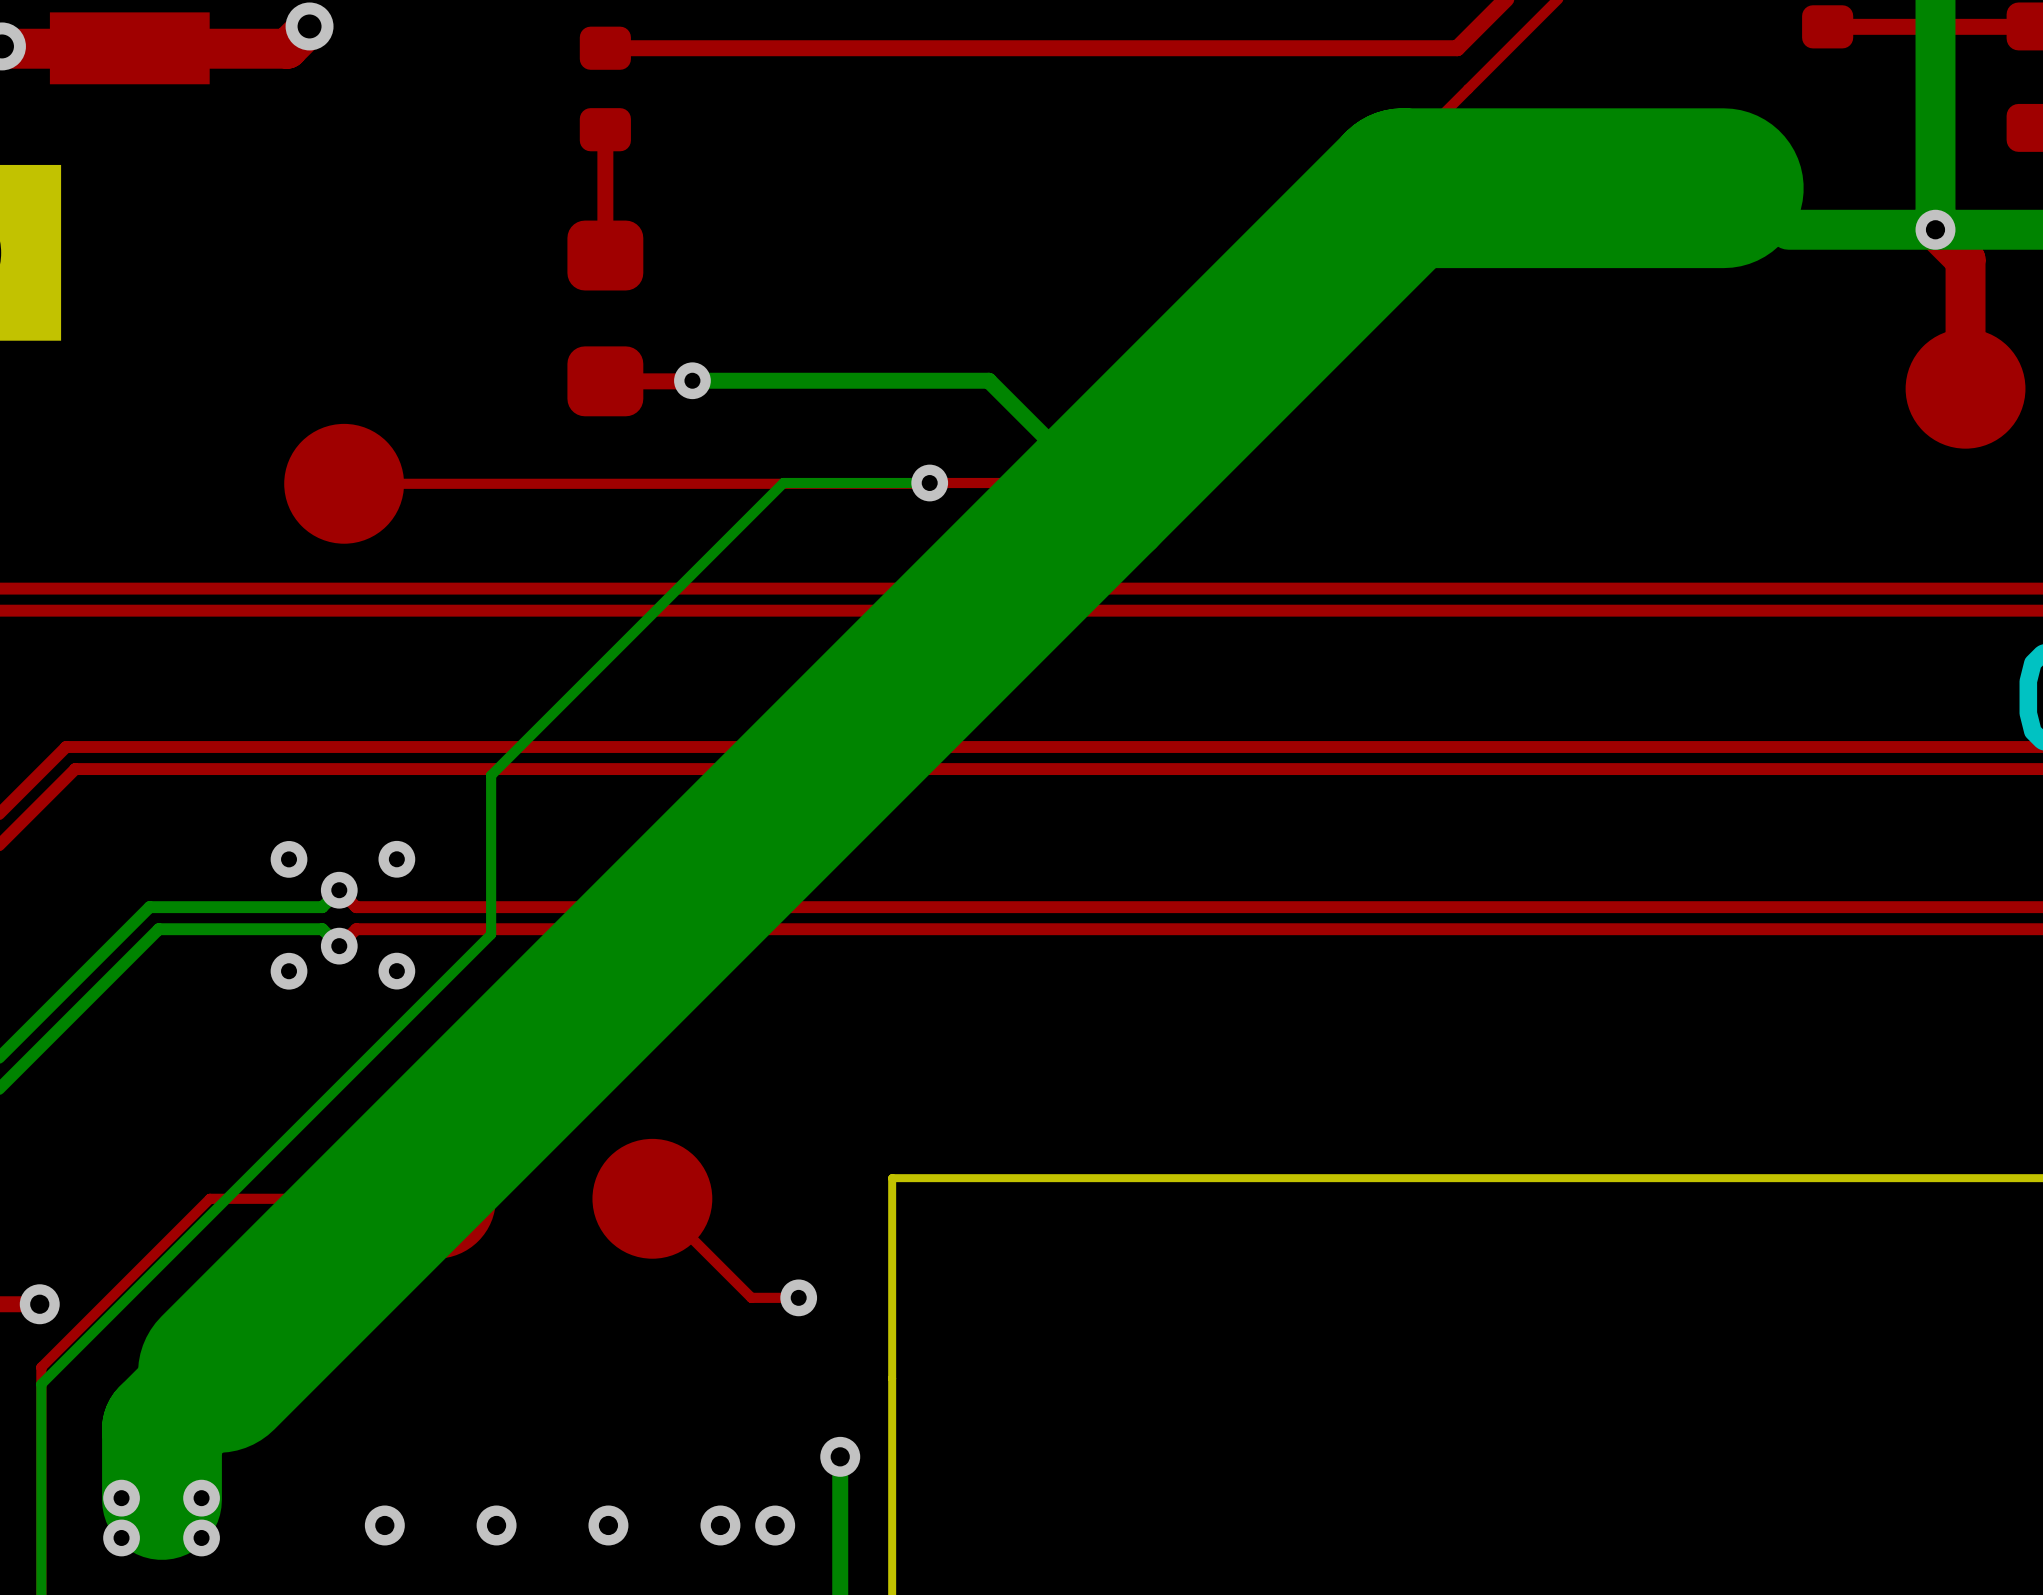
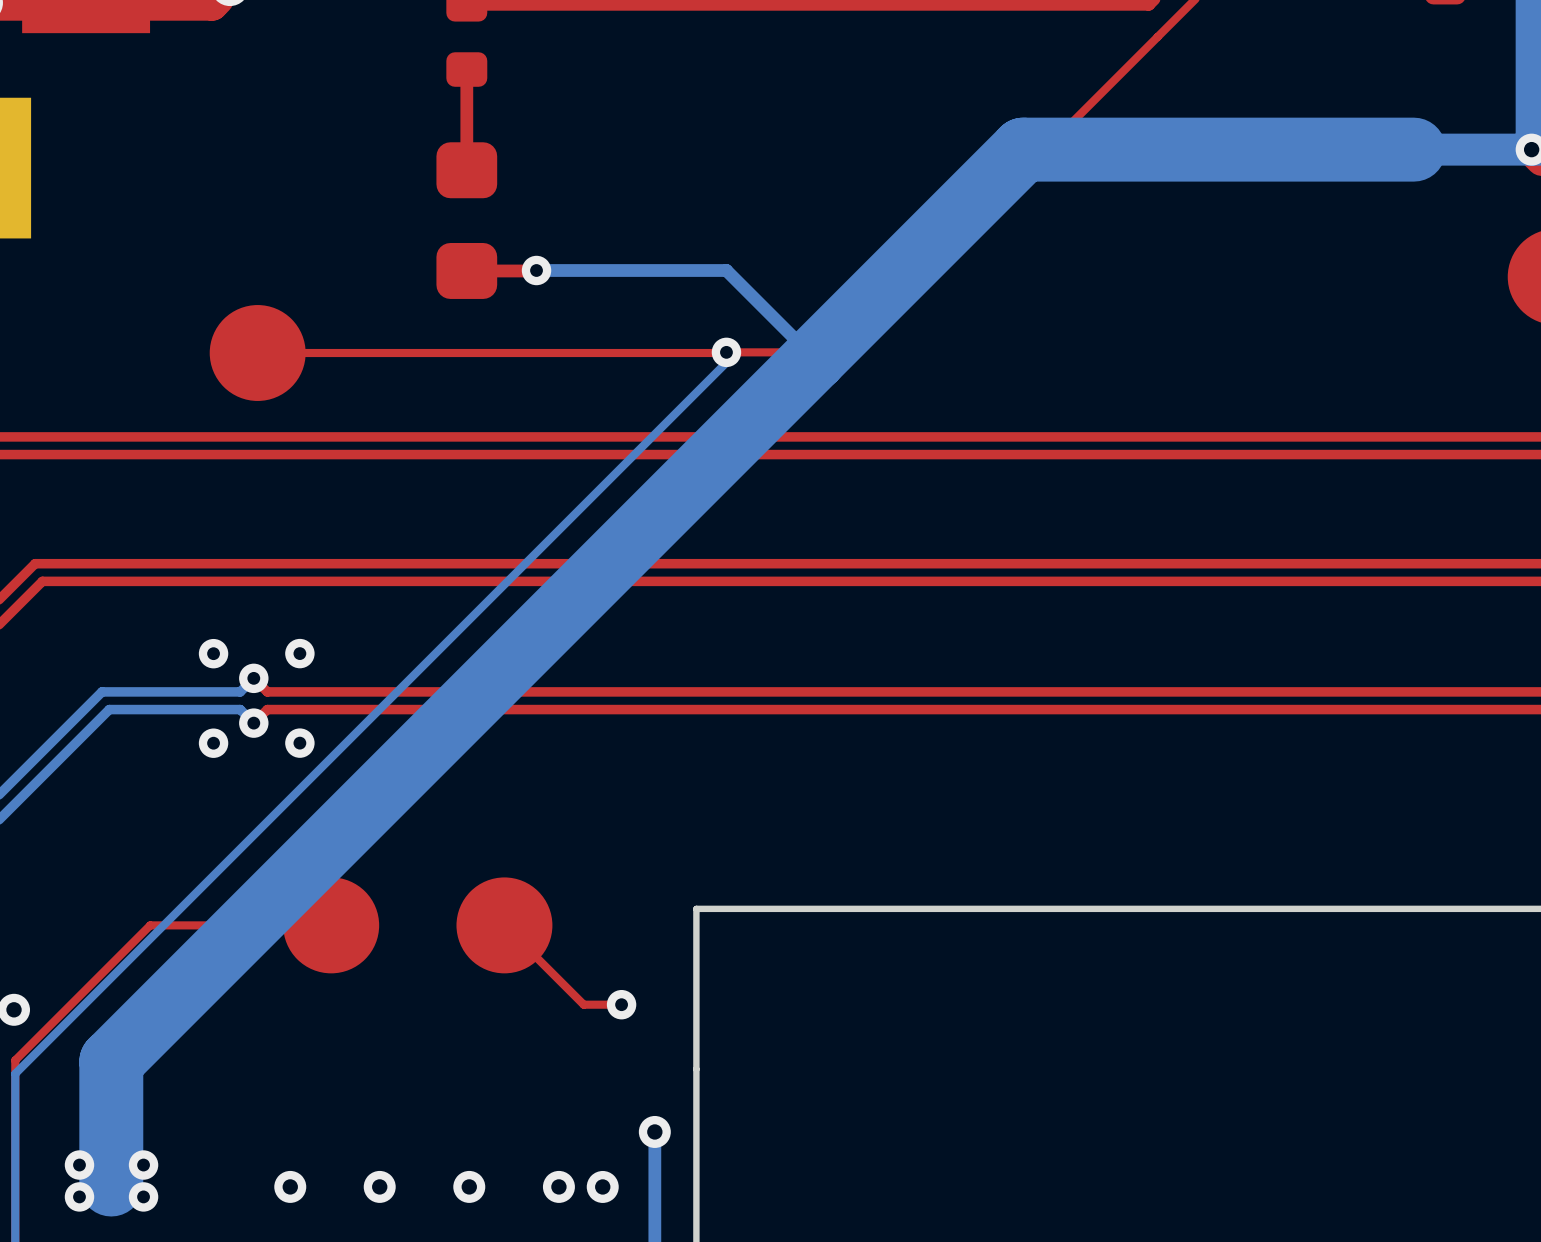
bottom track: (1723, 188) (1402, 188) (161, 1428) (161, 1499) -> none
bottom track: none -> (1413, 149) (1023, 149) (111, 1061) (111, 1184)
bottom track: (929, 380) (988, 380) (1099, 491) -> (726, 270) (814, 358)
bottom track: (929, 483) (783, 483) (491, 775) (491, 934) -> (726, 352) (726, 362) (375, 713)

